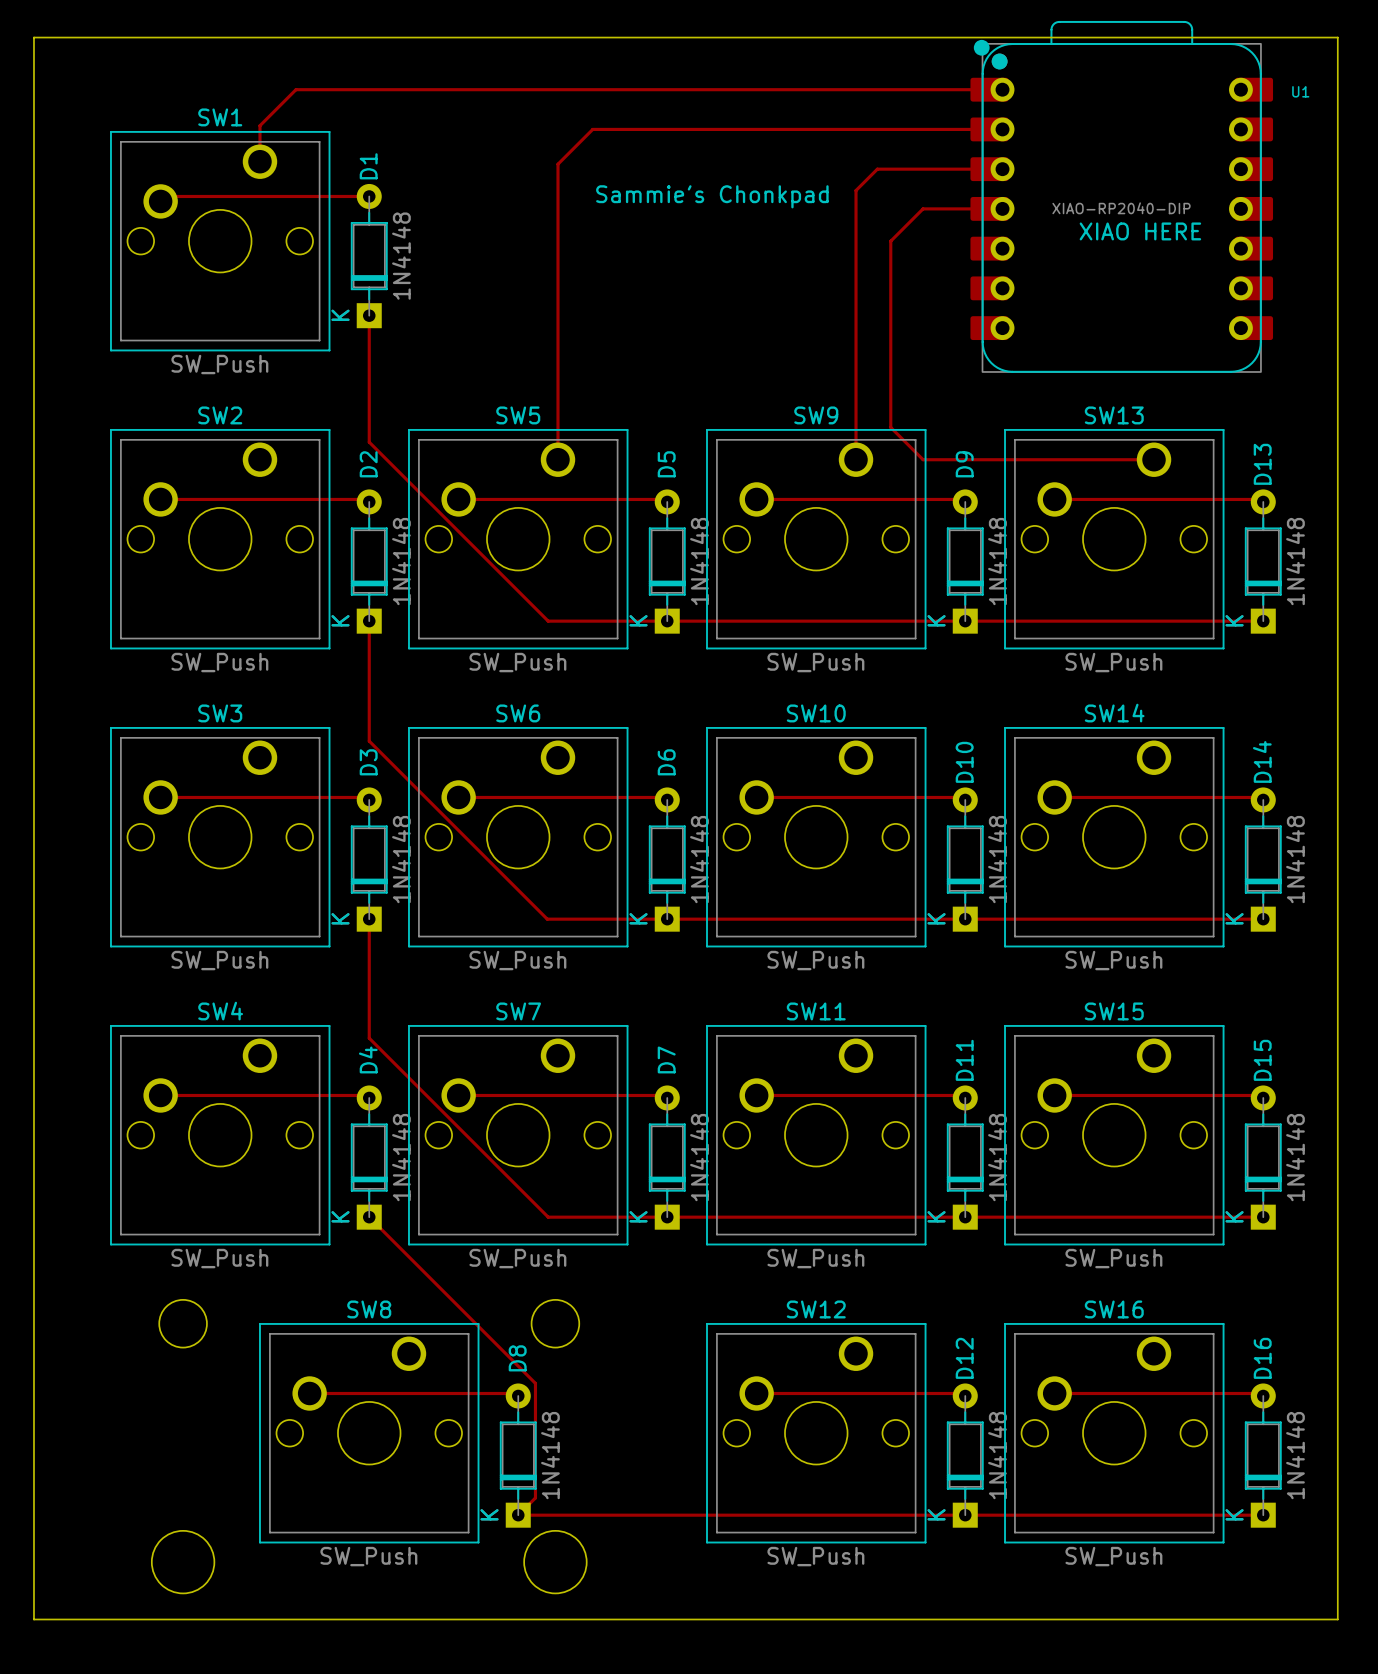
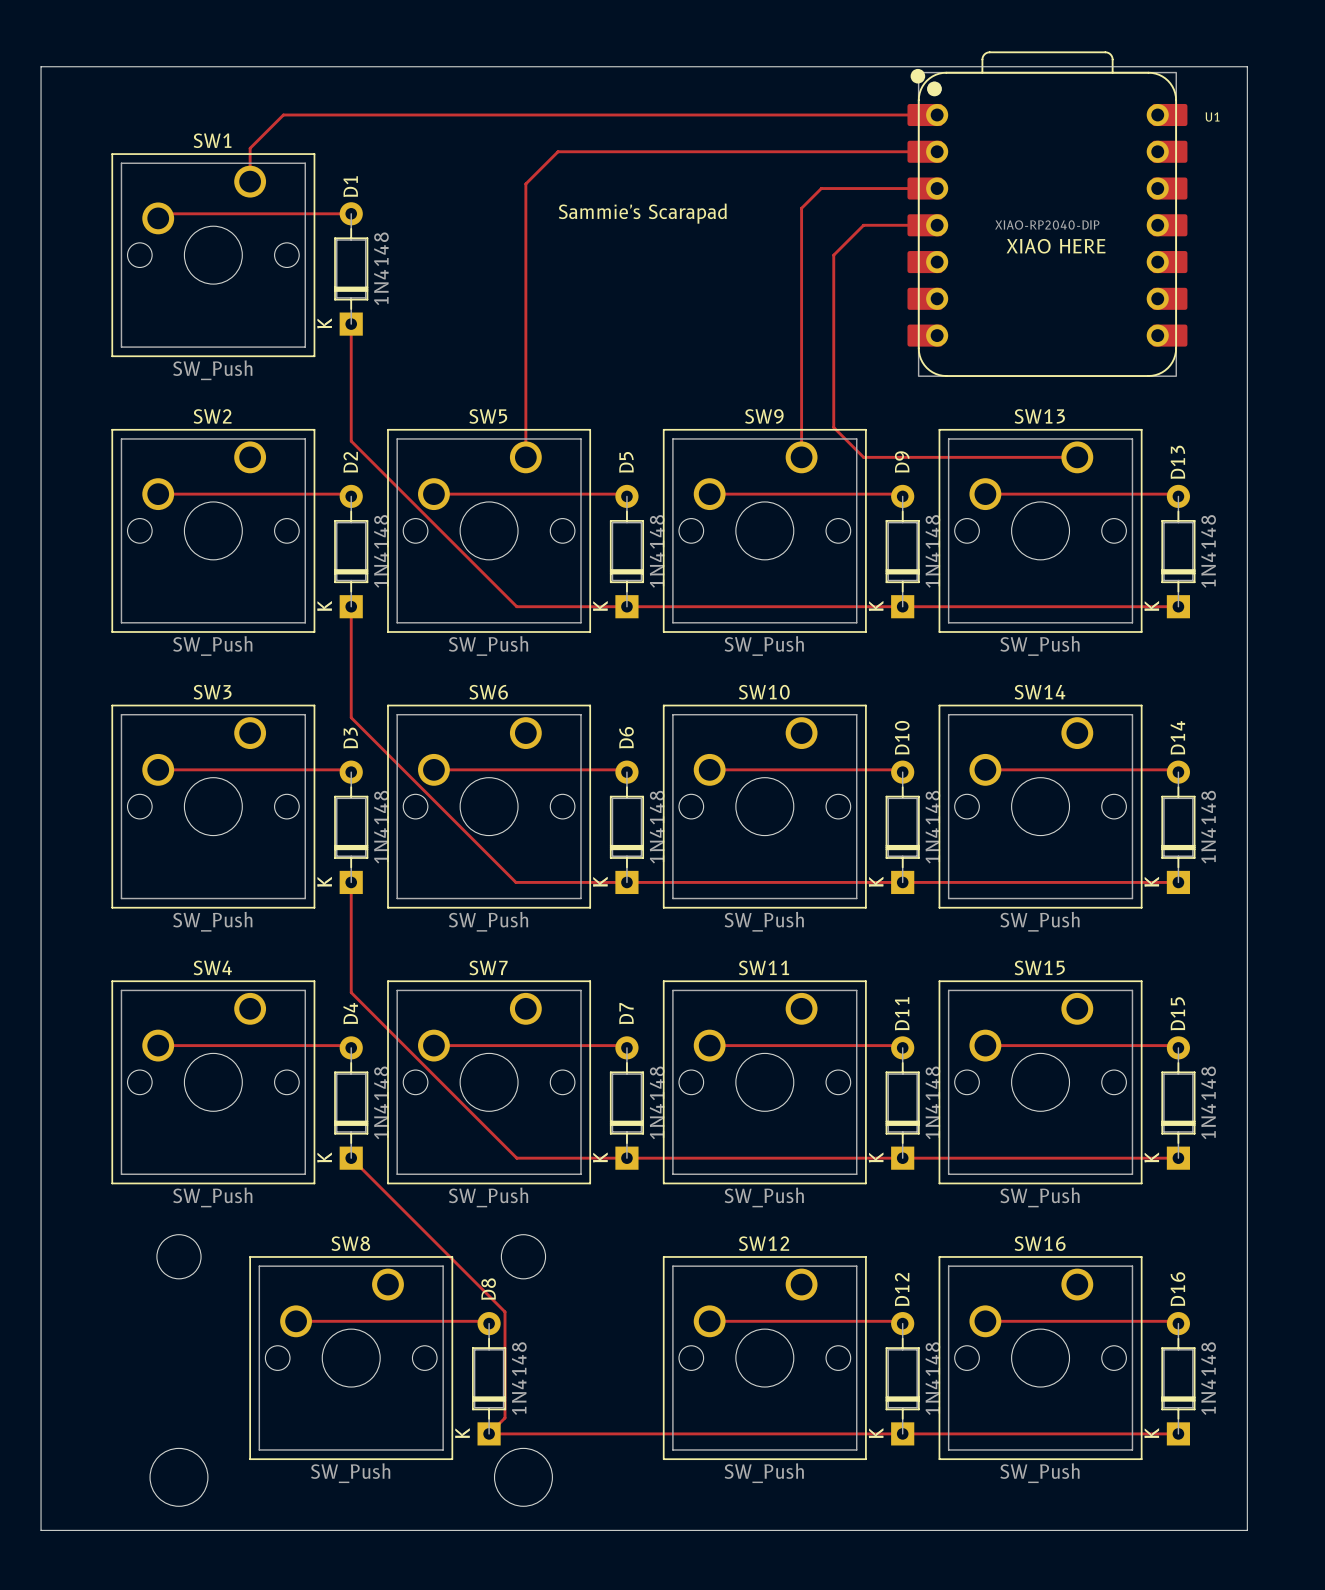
text: Sammie's Chonkpad (712, 196) -> Sammie's Scarapad (642, 213)

